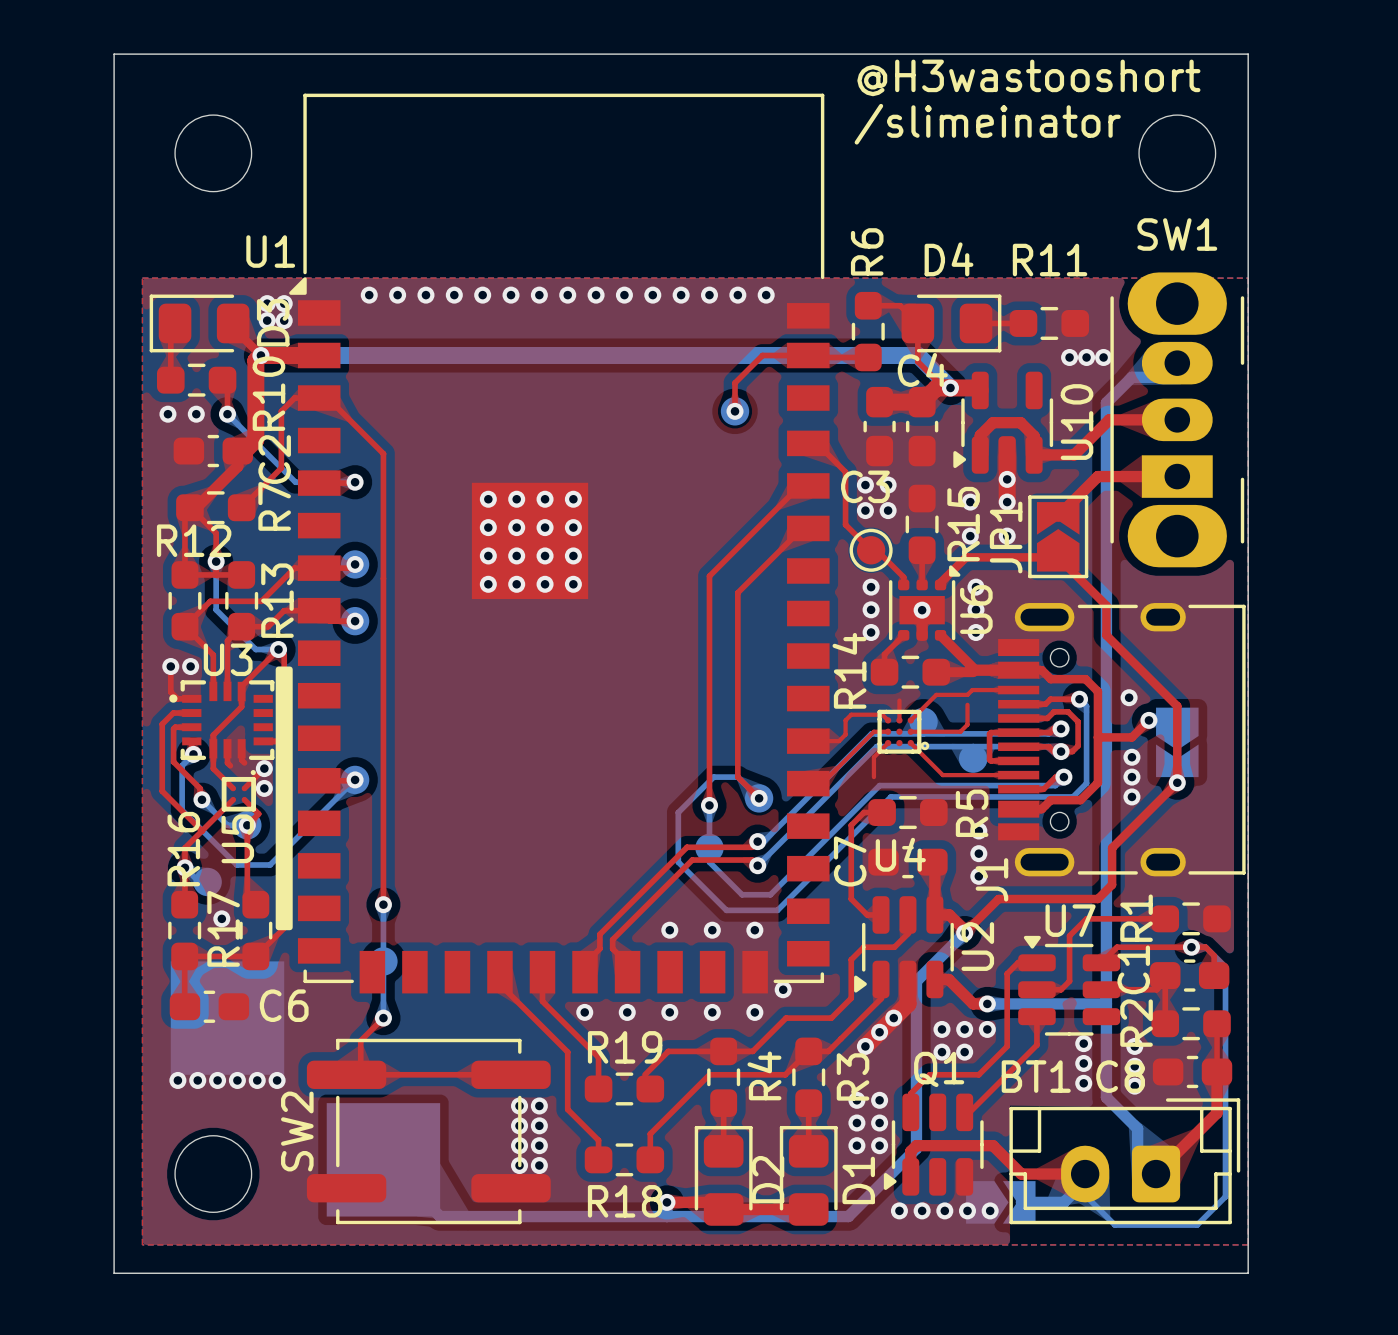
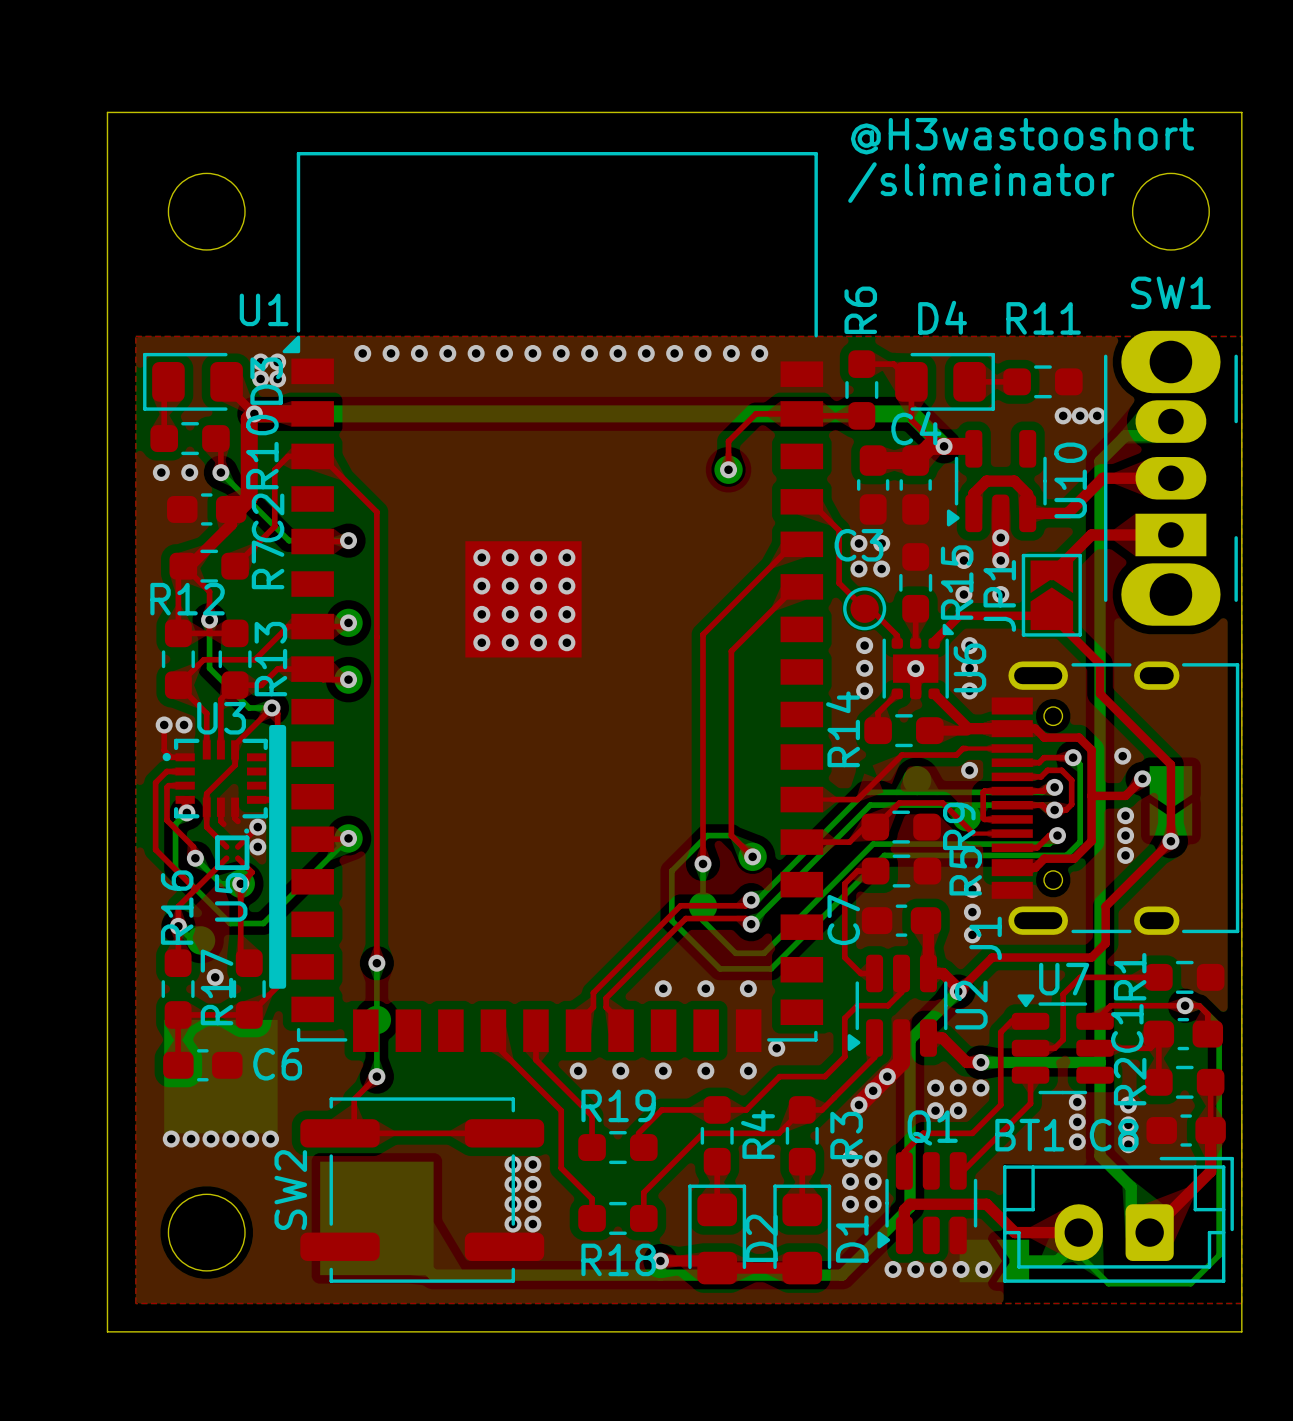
top track: (972, 690) (967, 694) (936, 694) (911, 720) -> (965, 748) (963, 748) (956, 755) (901, 755) (857, 799) (832, 799)
top track: (899, 700) (899, 720) -> none
top track: (967, 704) (967, 724) (960, 731) (910, 731) -> none
via: none -> (969, 770)
top track: (887, 720) (882, 714) (851, 714) (845, 720) (845, 734) (839, 741) -> none
top track: (888, 731) (873, 731) (822, 783) -> none
U4: (903, 731) -> none
top track: (888, 743) (873, 757) (873, 777) -> none
top track: (911, 743) (942, 775) (979, 775) -> (815, 842) (849, 842) (864, 827) (875, 827) (899, 802) (942, 802) (973, 833)
R9: none -> (901, 827)

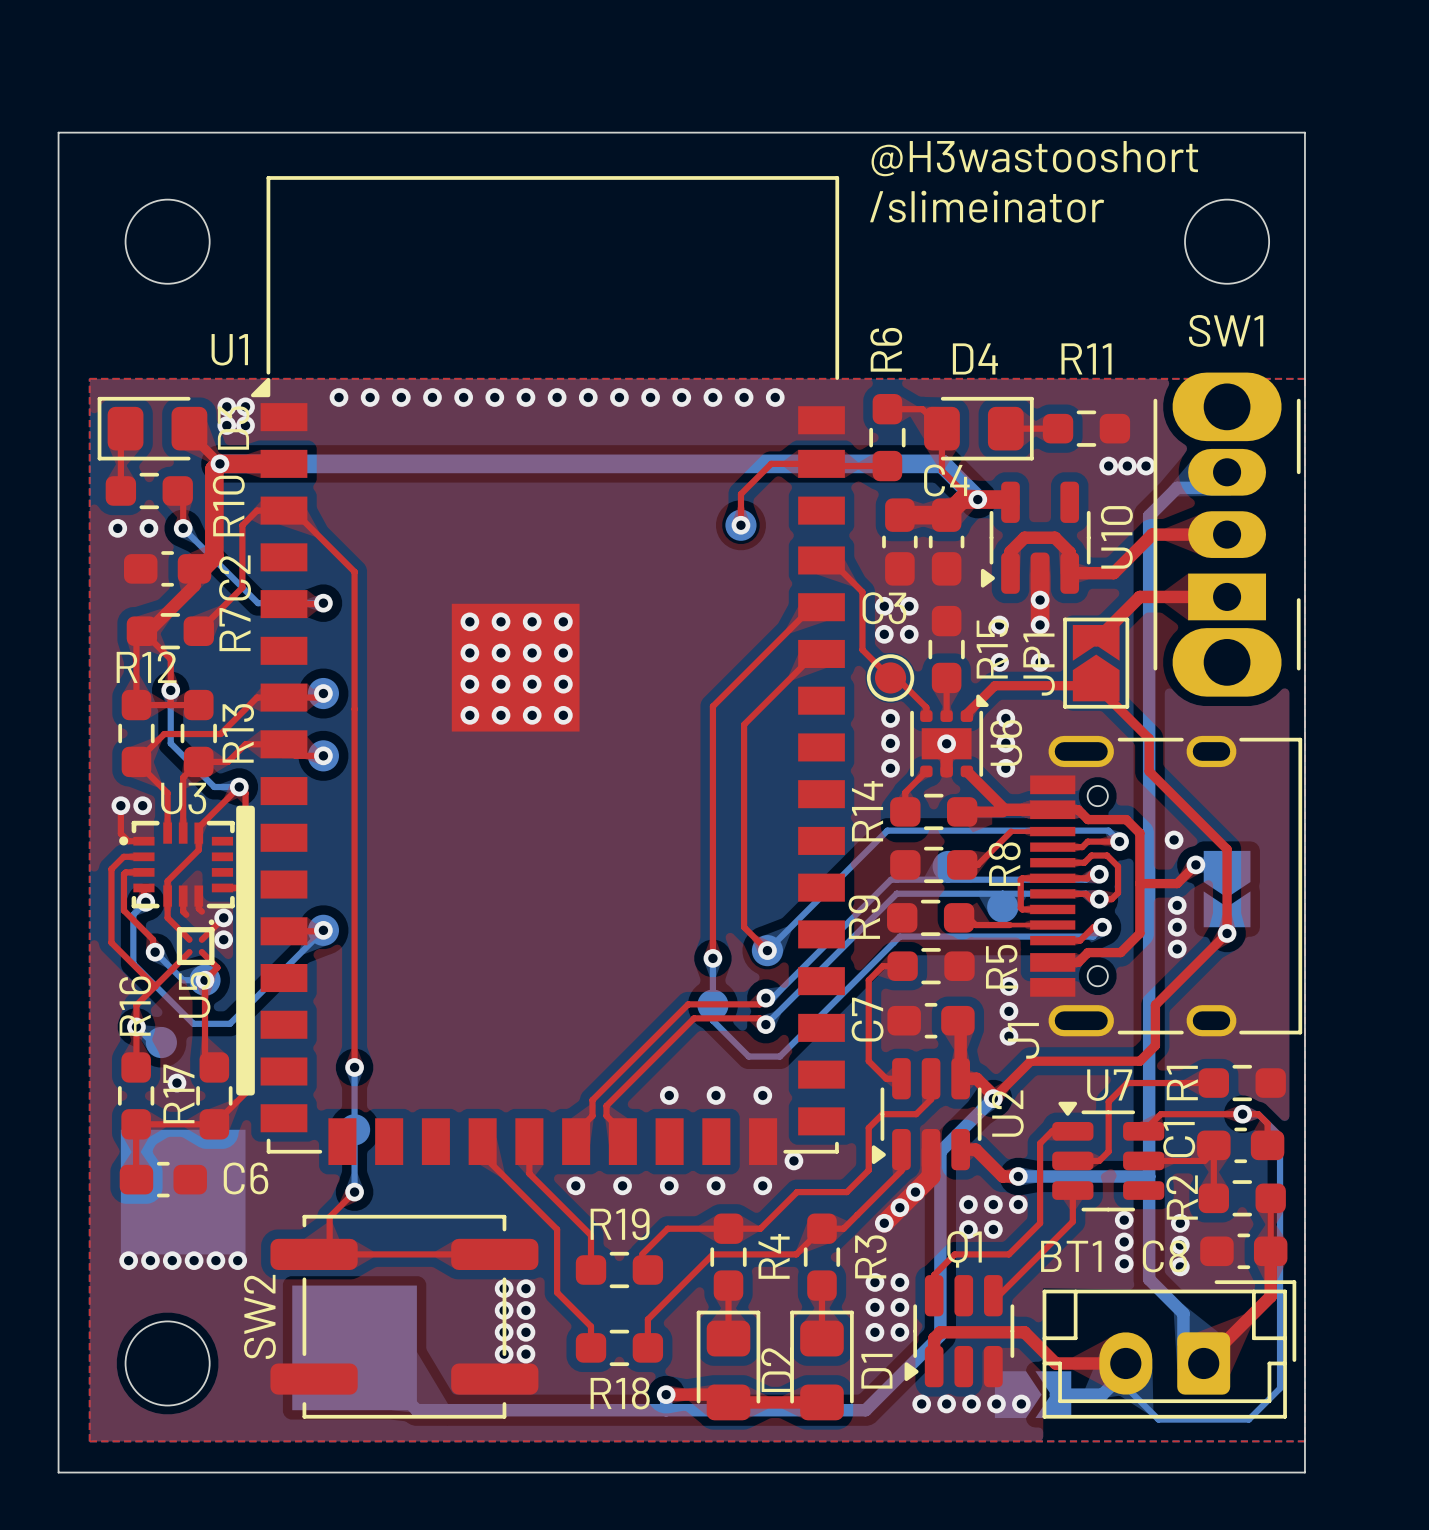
top track: (974, 748) (963, 748) (956, 755) (901, 755) (857, 799) (801, 799) -> (1011, 831) (977, 864) (962, 864)
bottom track: (1073, 757) (1080, 764) (1080, 841) (1066, 855) (884, 855) (771, 968) (720, 968) (671, 920) (671, 871) (707, 835) (731, 835) (752, 856) -> (1119, 841) (1108, 830) (887, 830) (767, 950)
via: (969, 770) -> none
R8: none -> (933, 864)
R9 name position: R9 (959, 826) -> R9 (864, 917)
top track: (973, 833) (942, 802) (899, 802) (875, 827) (864, 827) (849, 842) (801, 842) -> (1009, 925) (975, 925) (962, 911)

